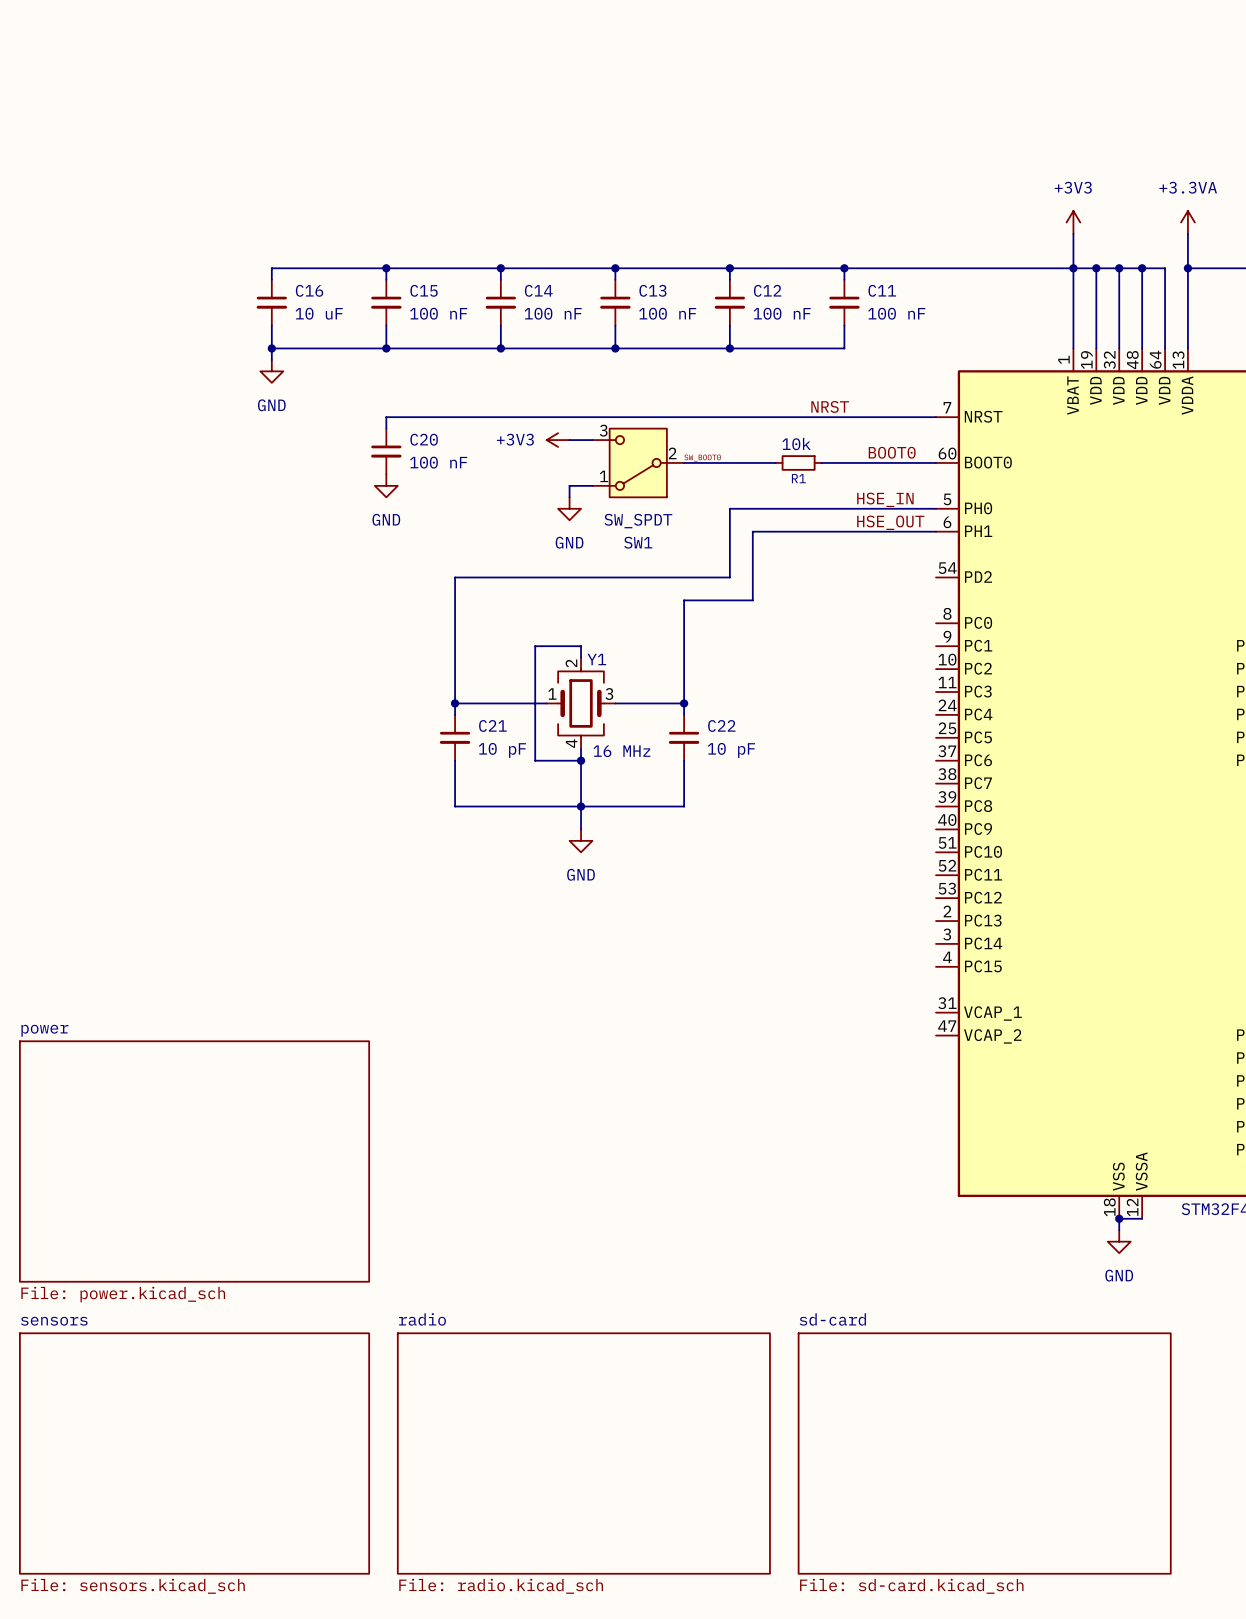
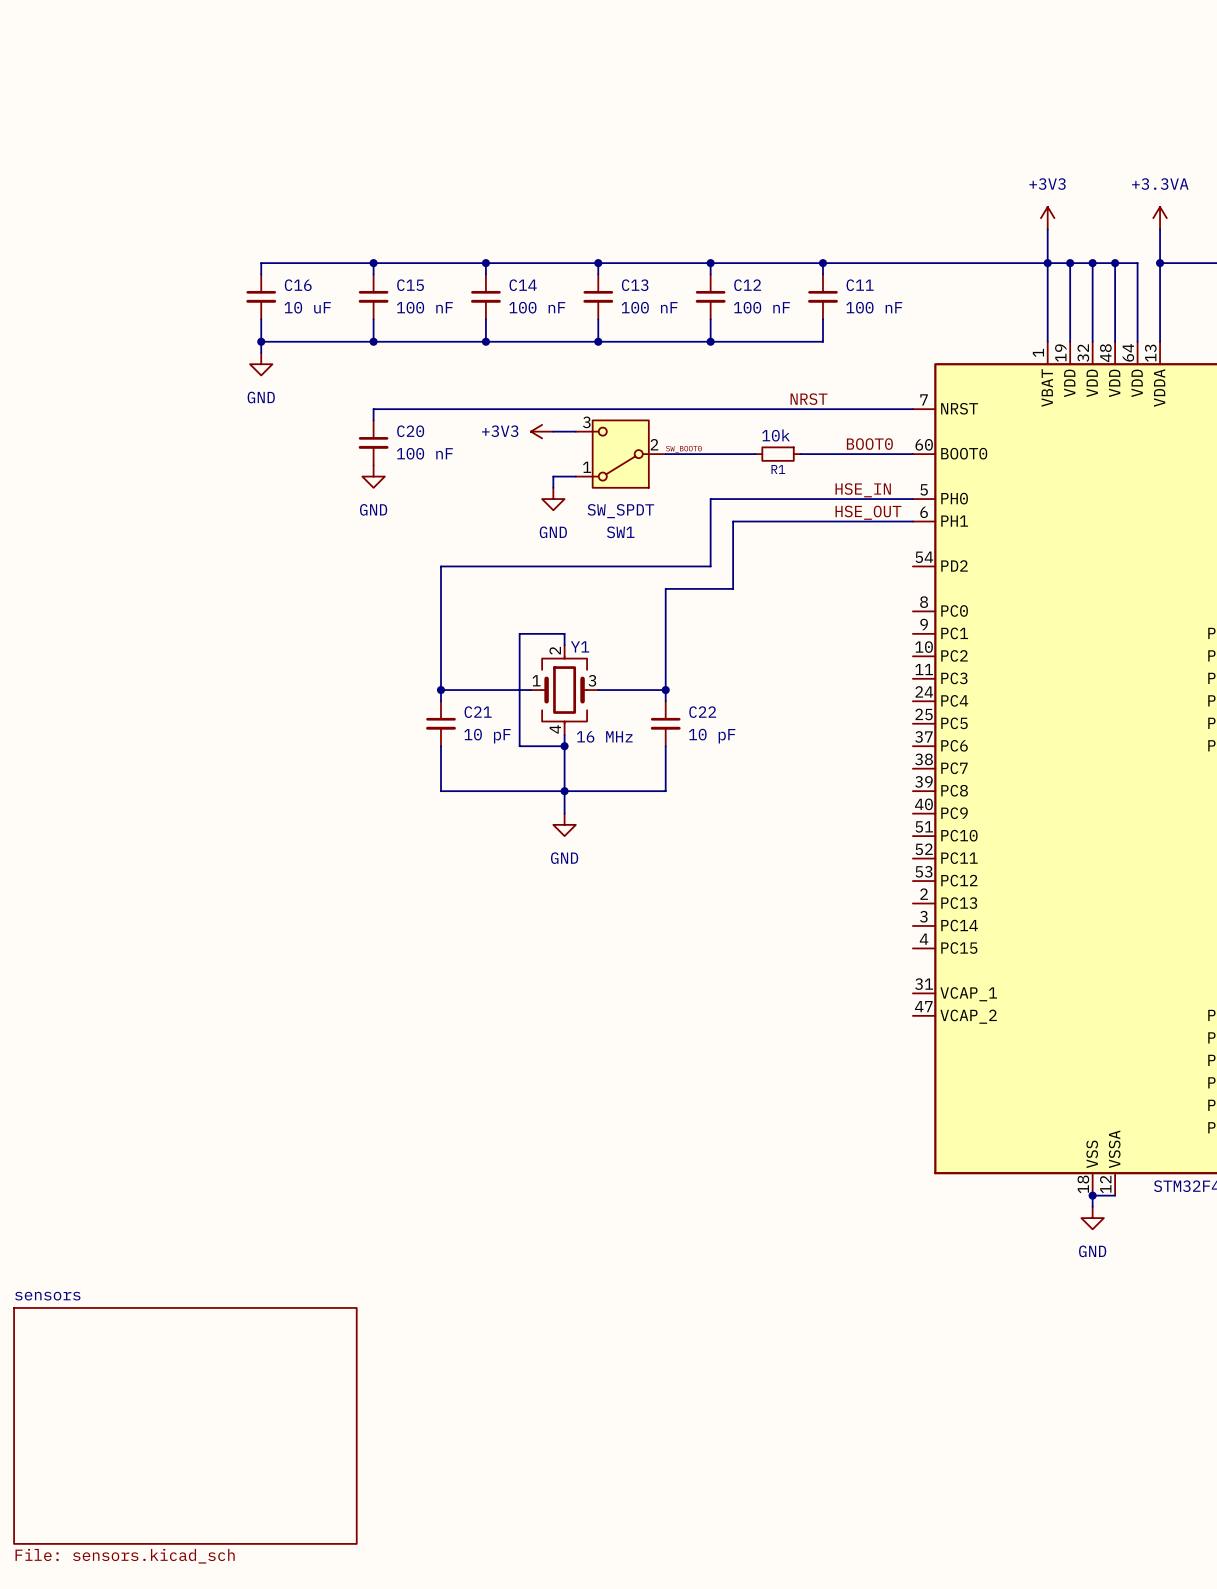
sheet power: File: power.kicad_sch (194, 1161) -> none
sheet radio: File: radio.kicad_sch (583, 1453) -> none
sheet sd-card: File: sd-card.kicad_sch (984, 1453) -> none

